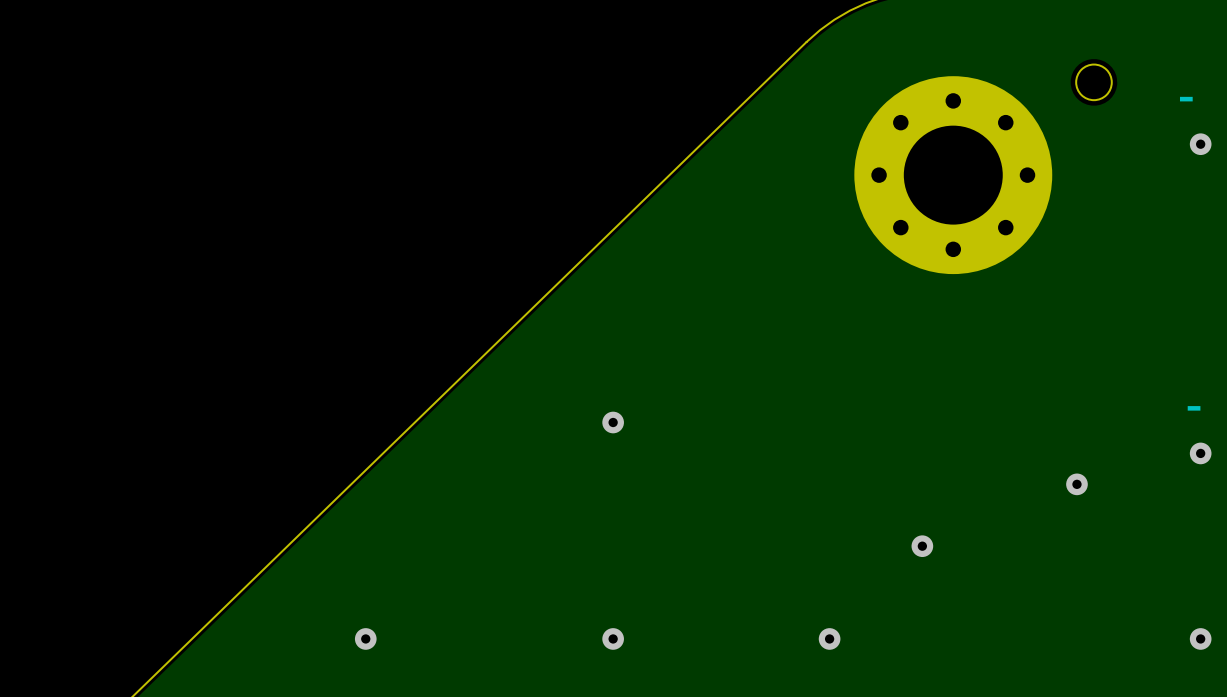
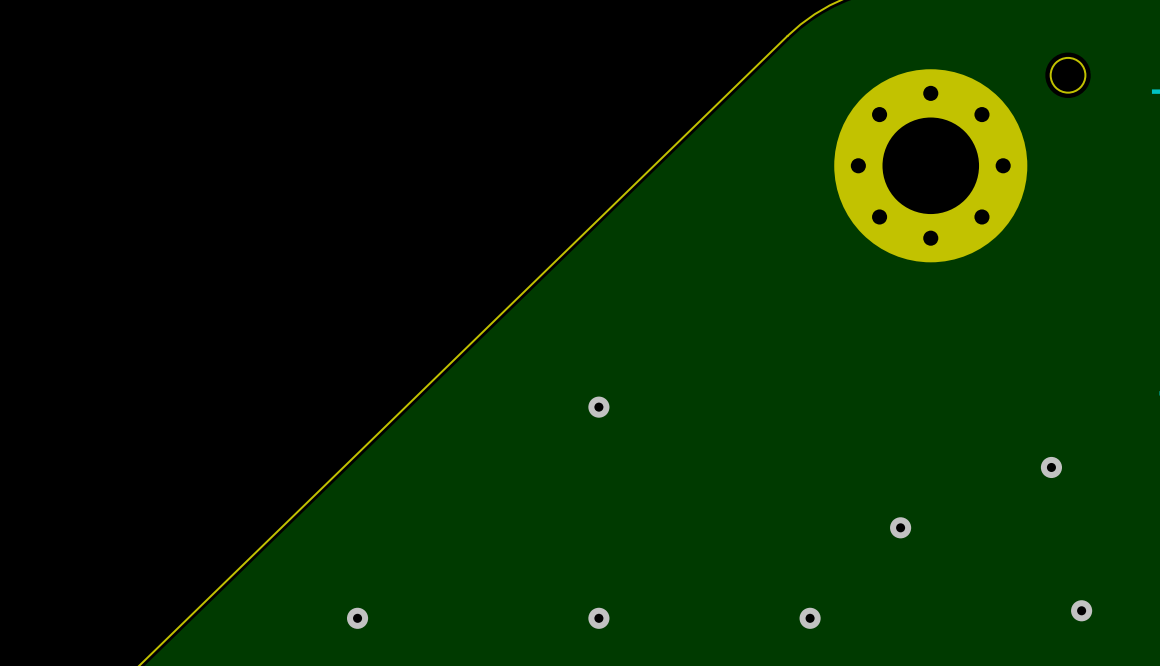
via: none -> (1081, 610)

